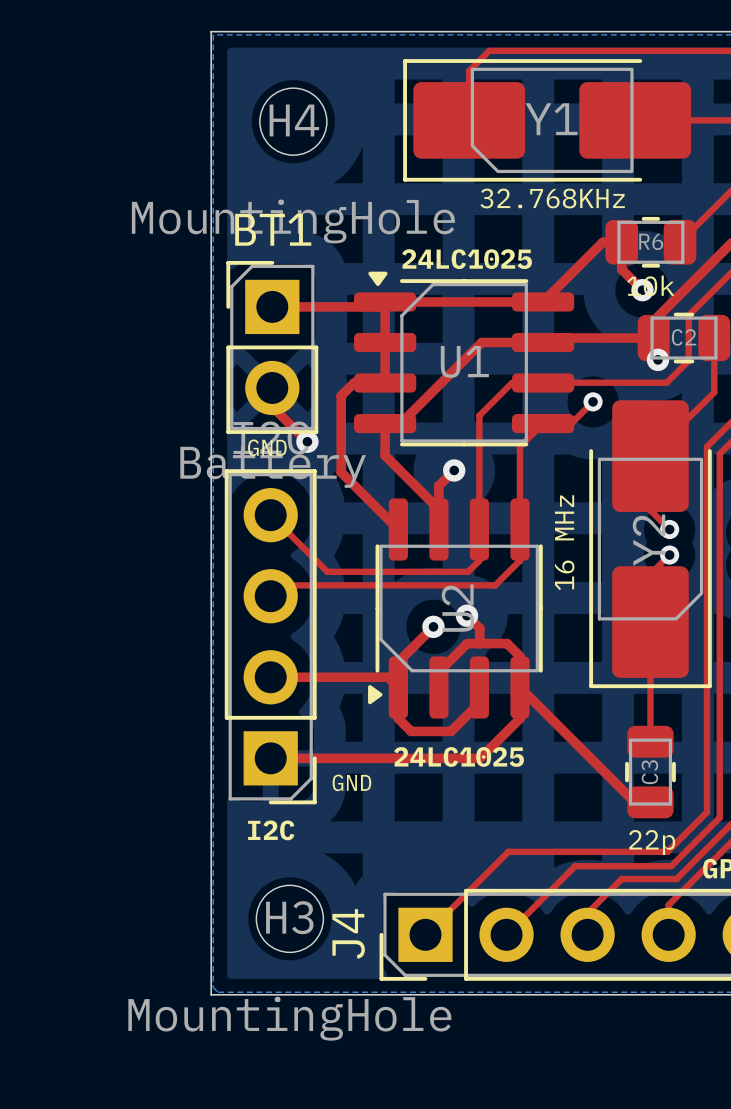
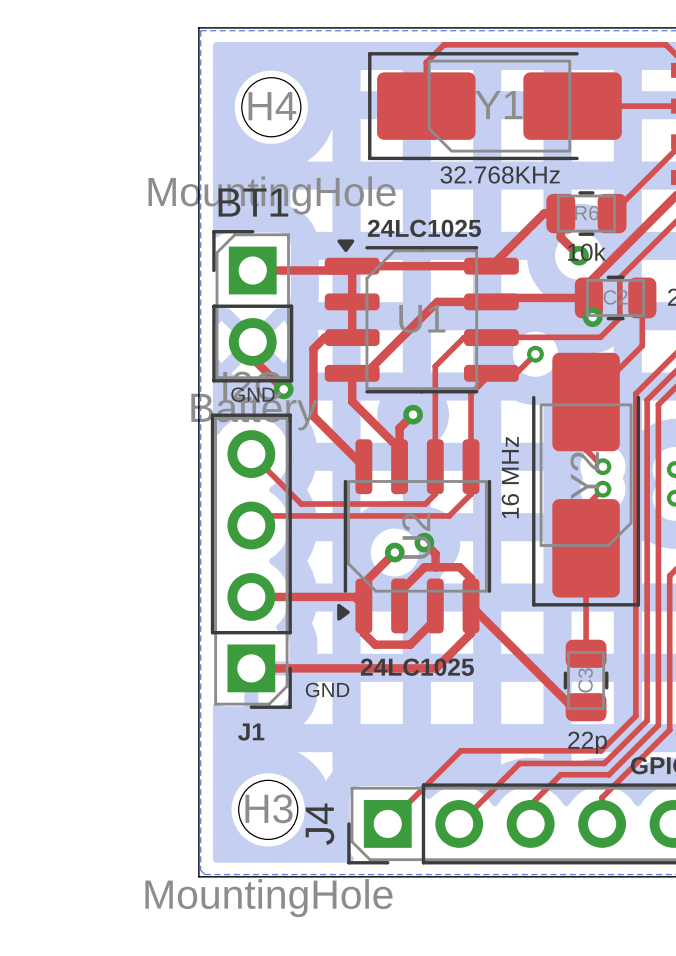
I2C name: I2C (271, 830) -> J1 (251, 732)

